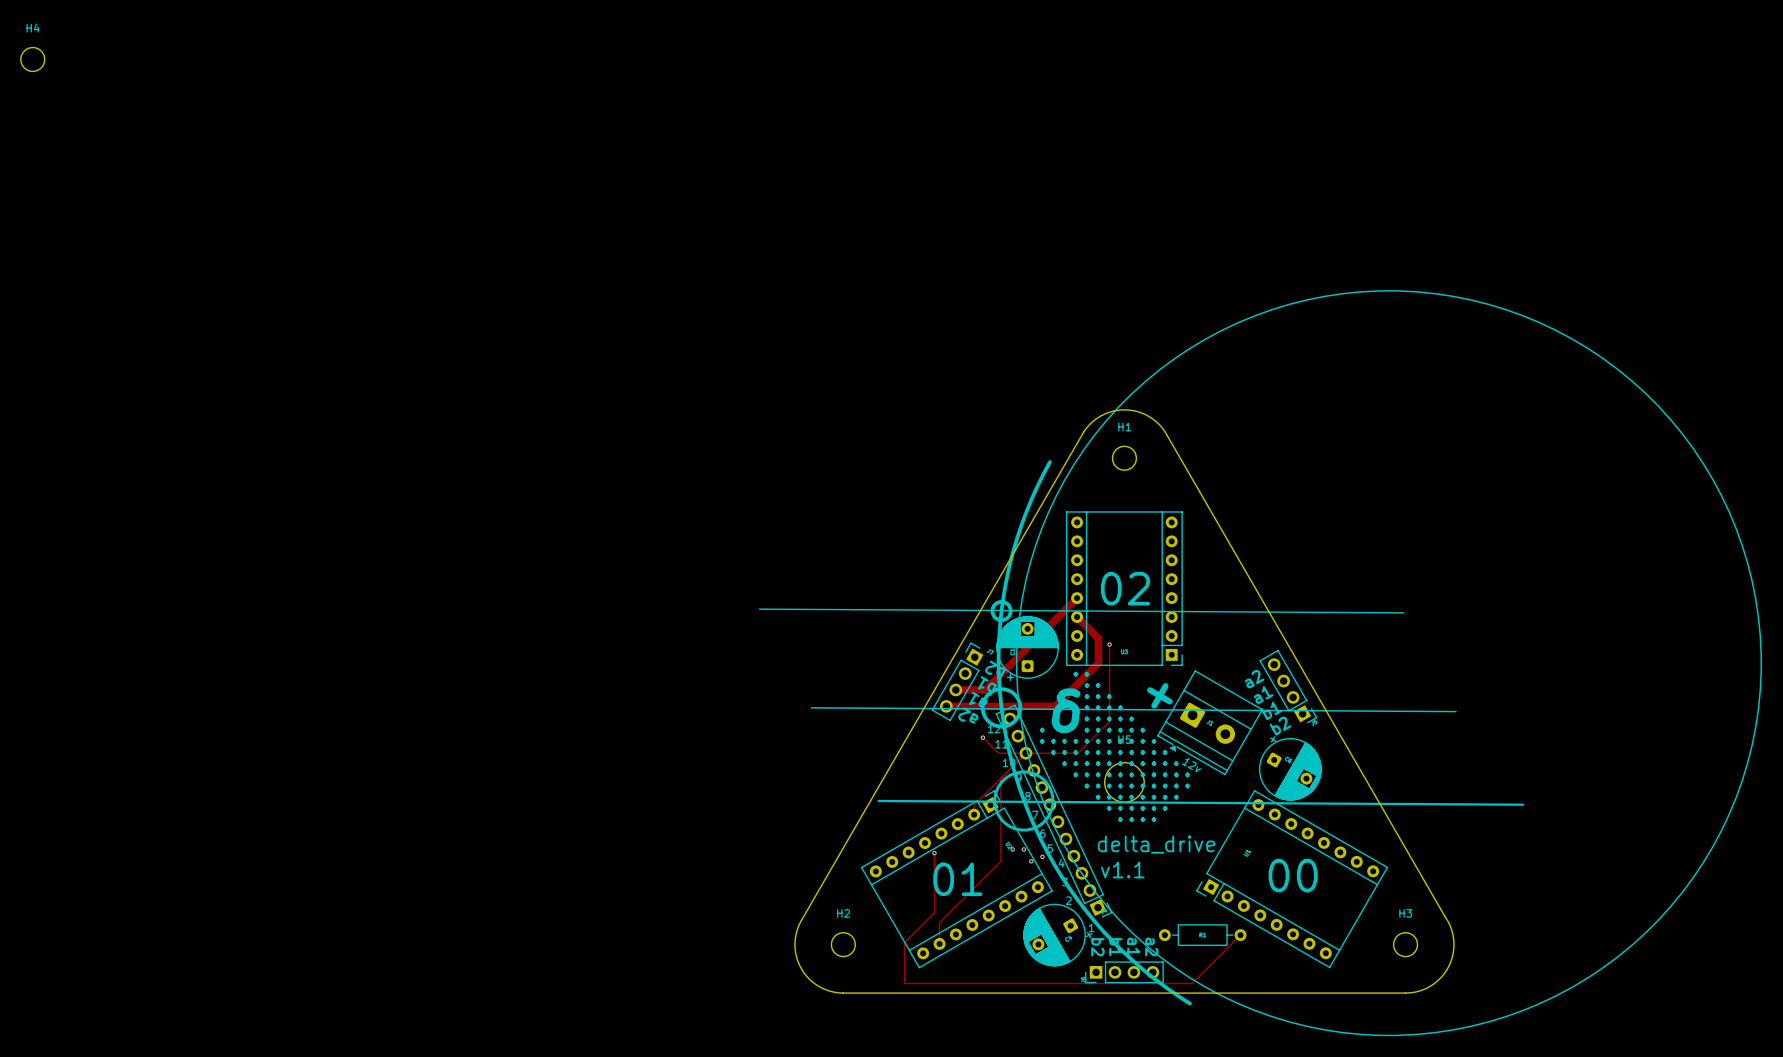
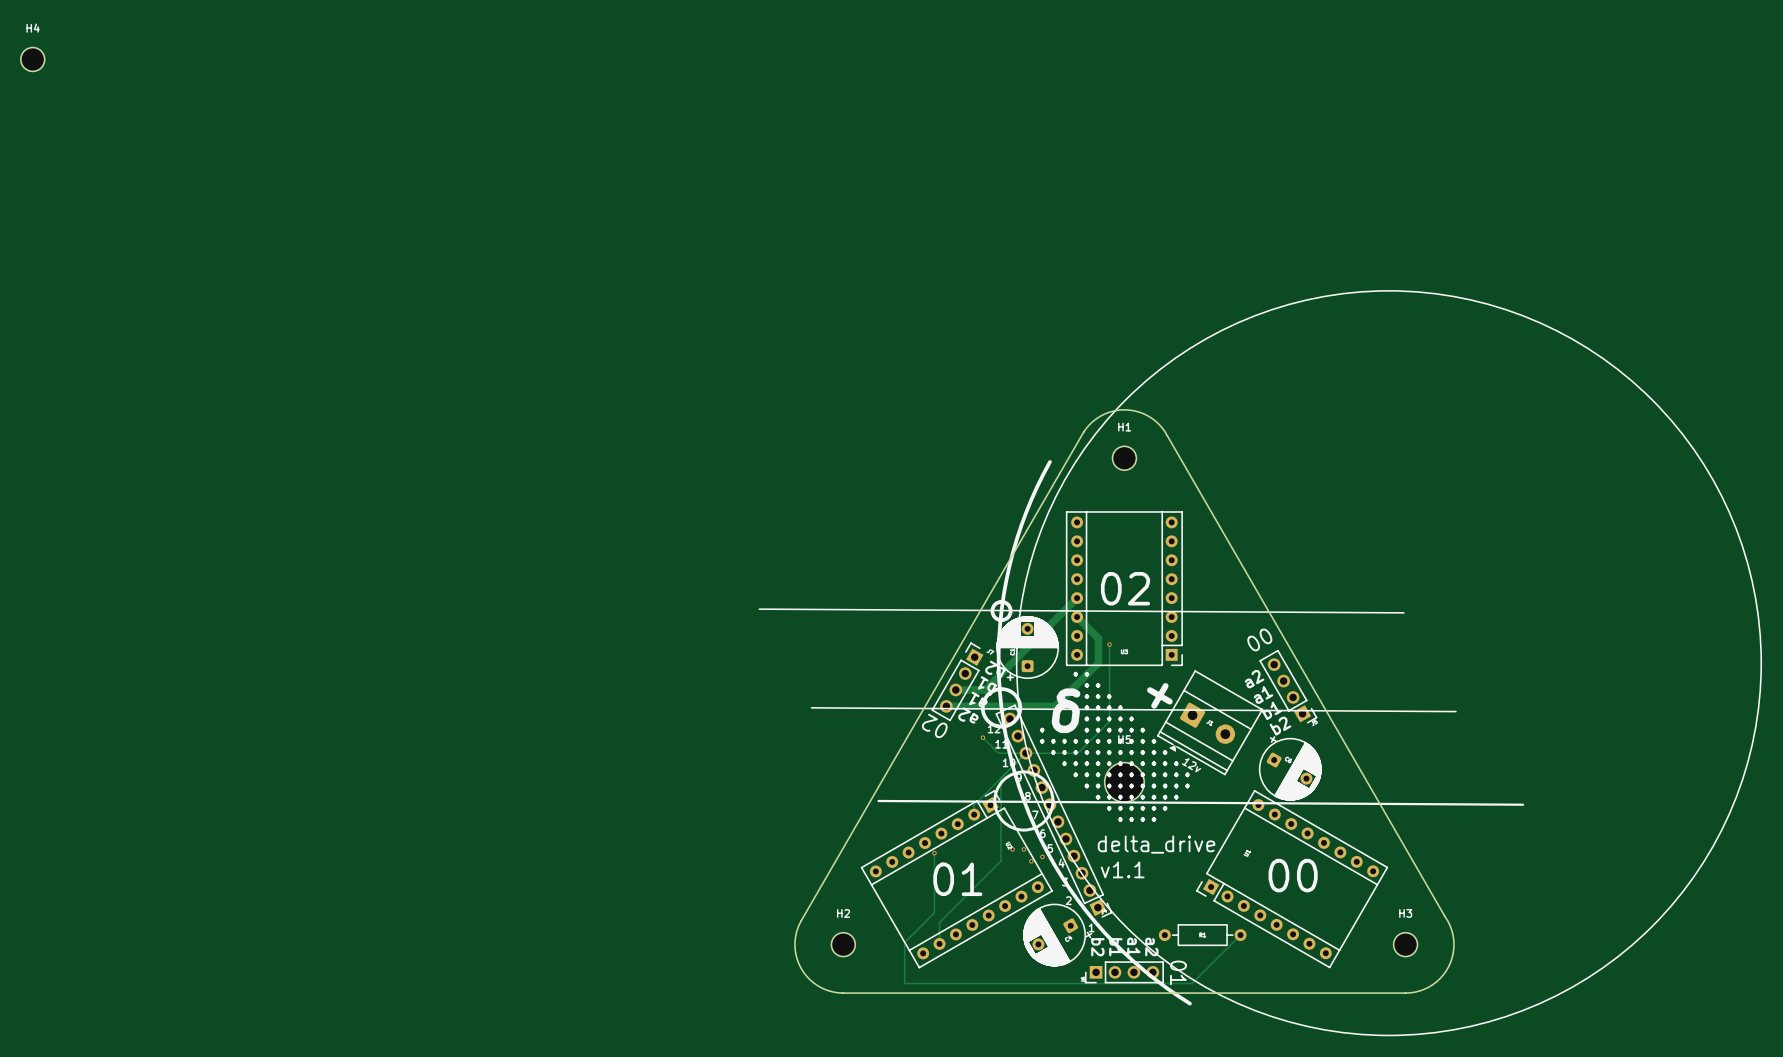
text: none -> 00 (1259, 639)
text: none -> 02 (934, 725)
text: none -> 01 (1178, 972)

